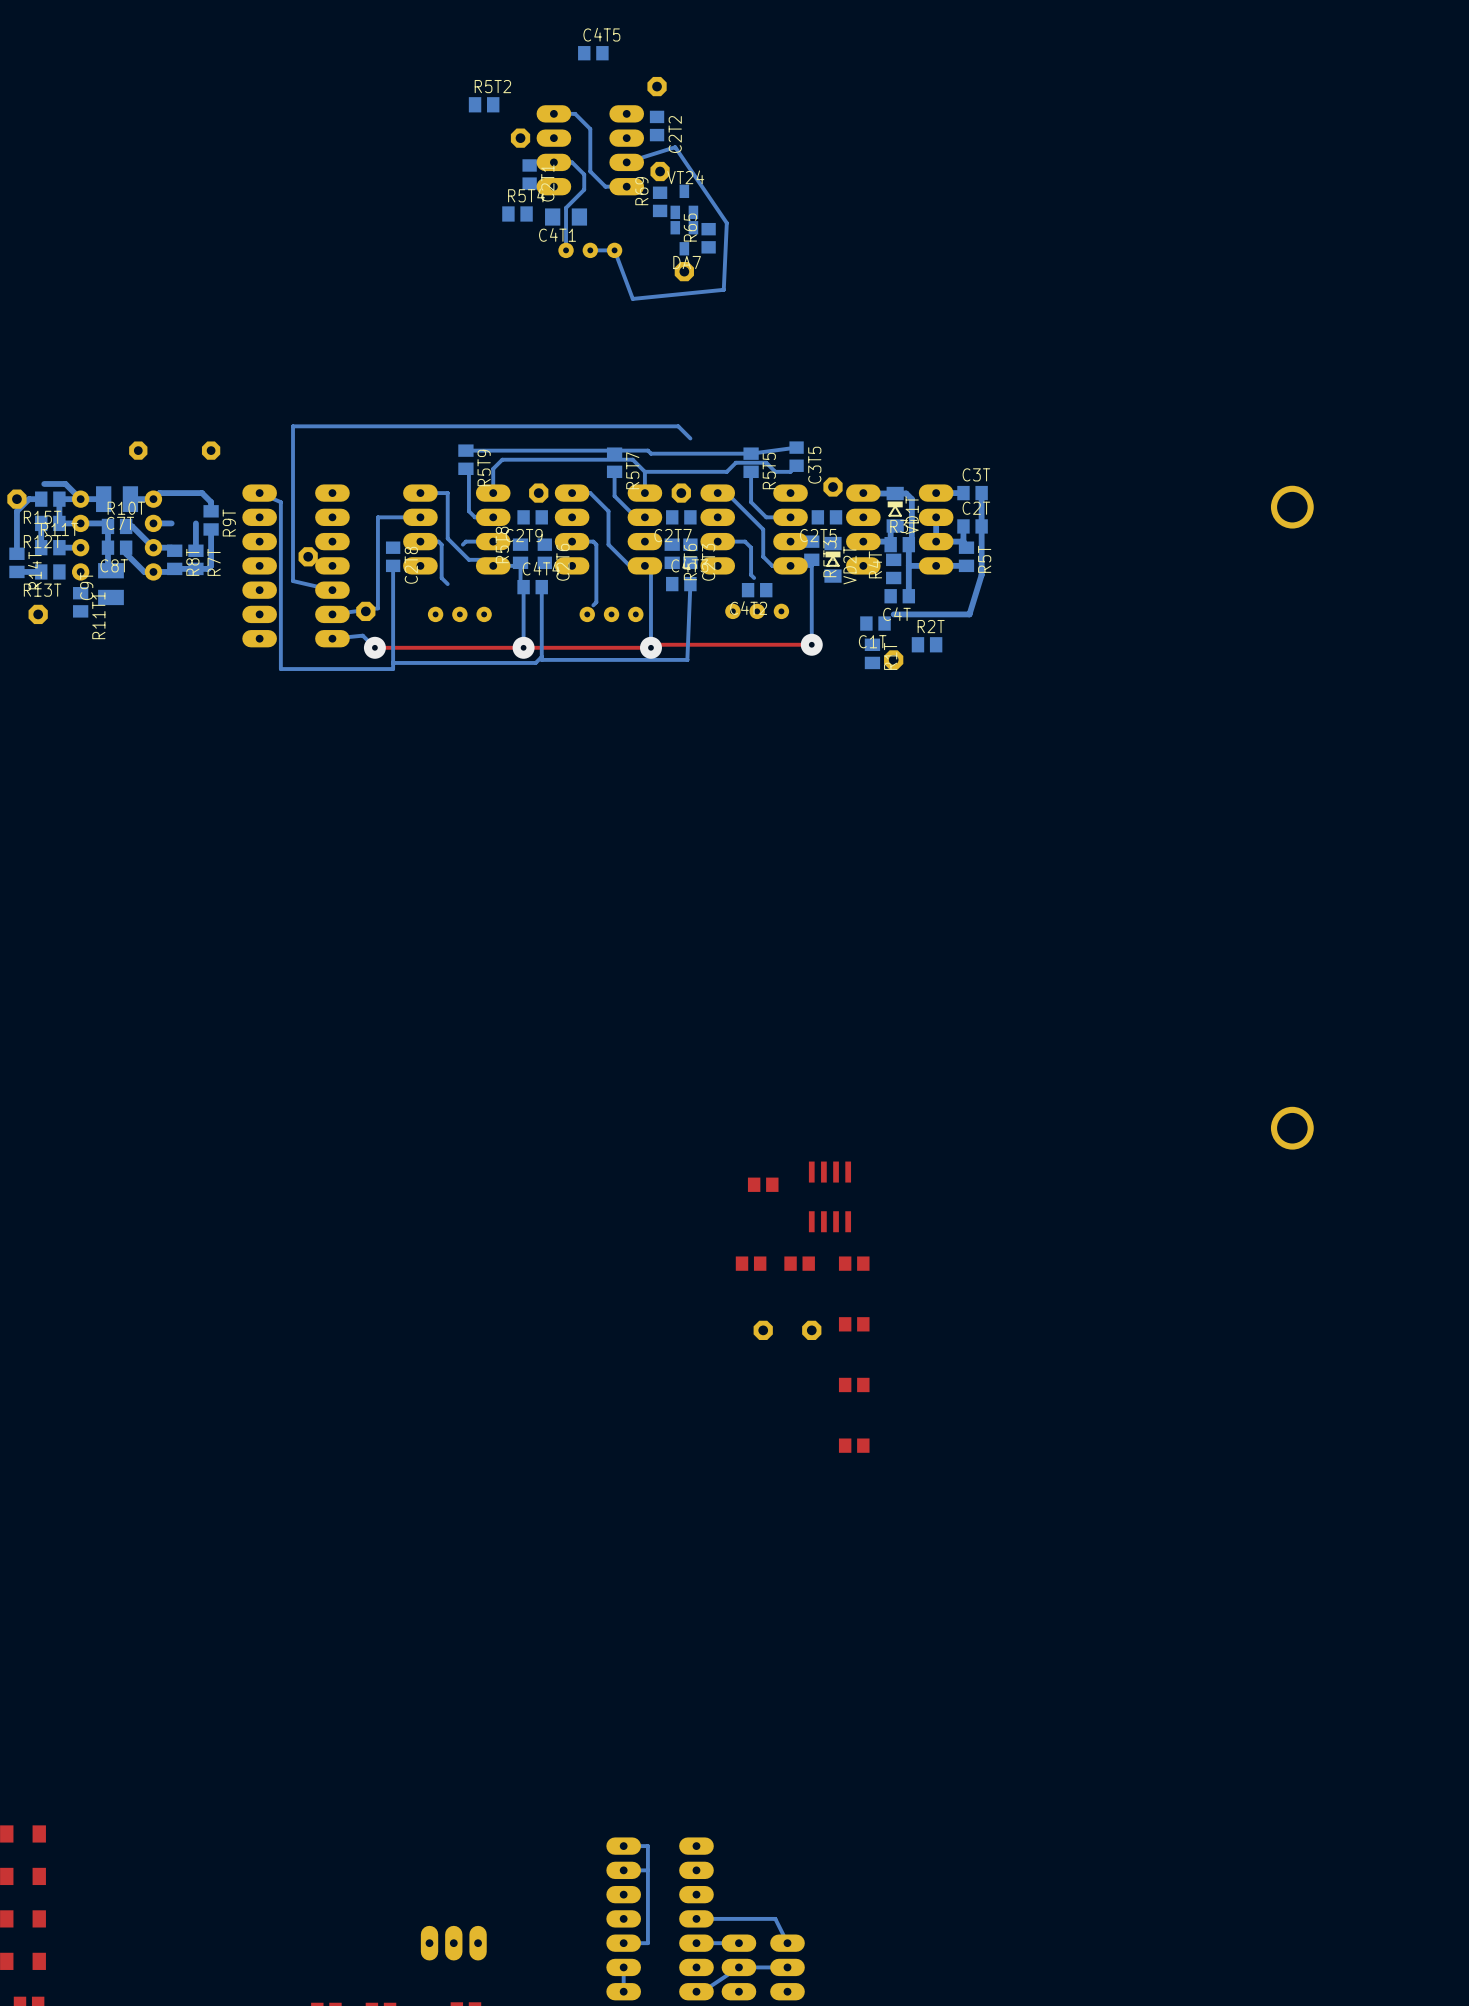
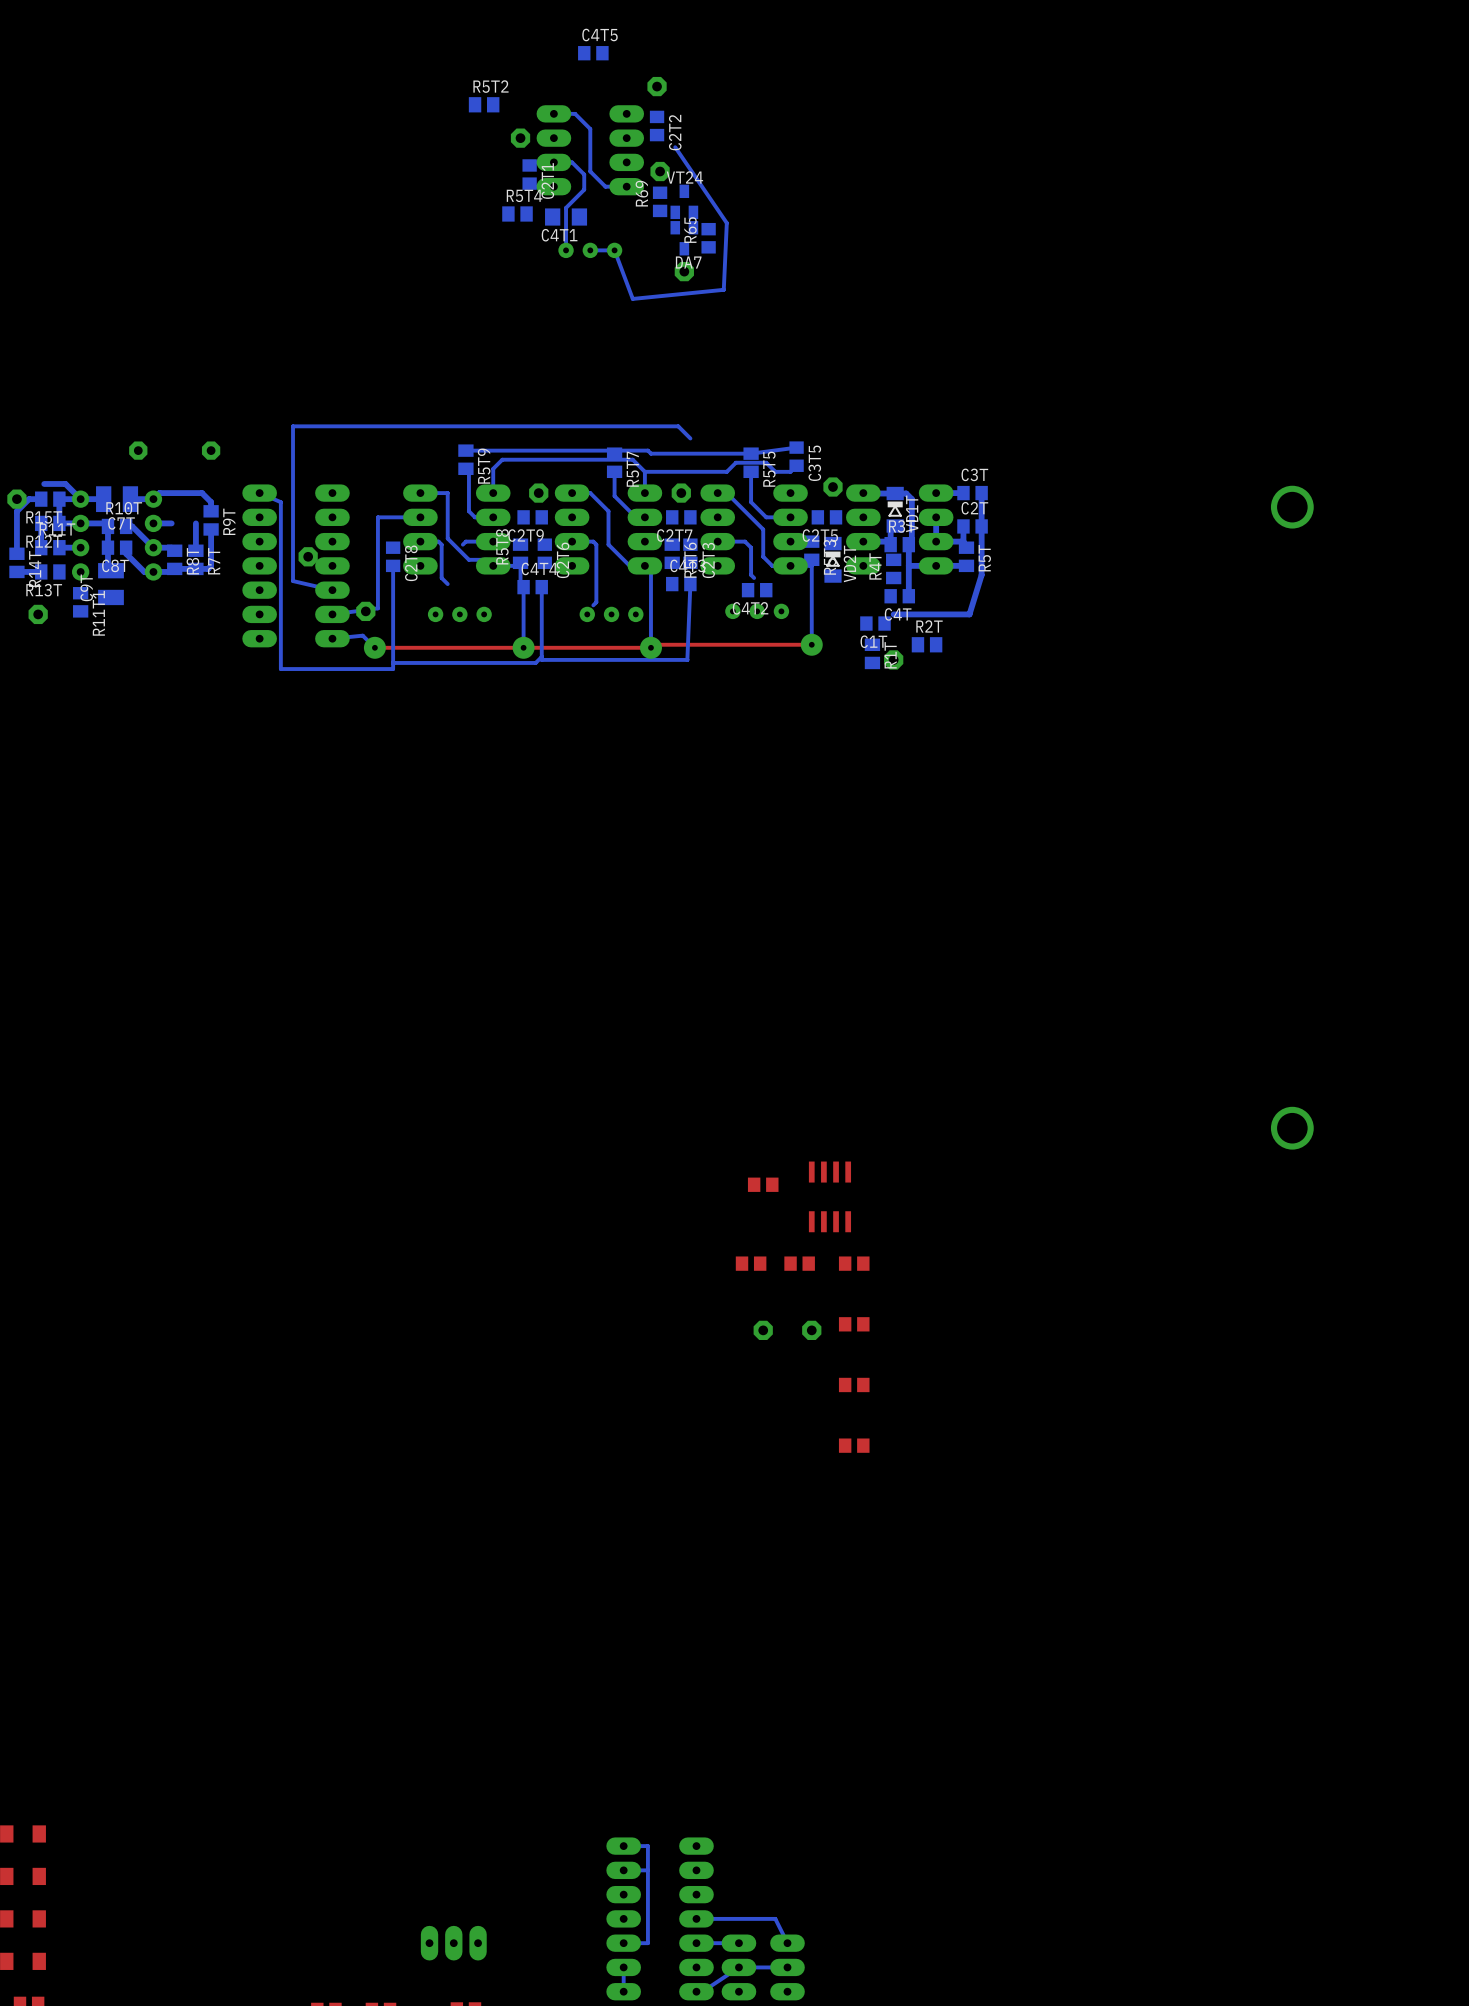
bottom track: (675, 147) (626, 162) -> none

